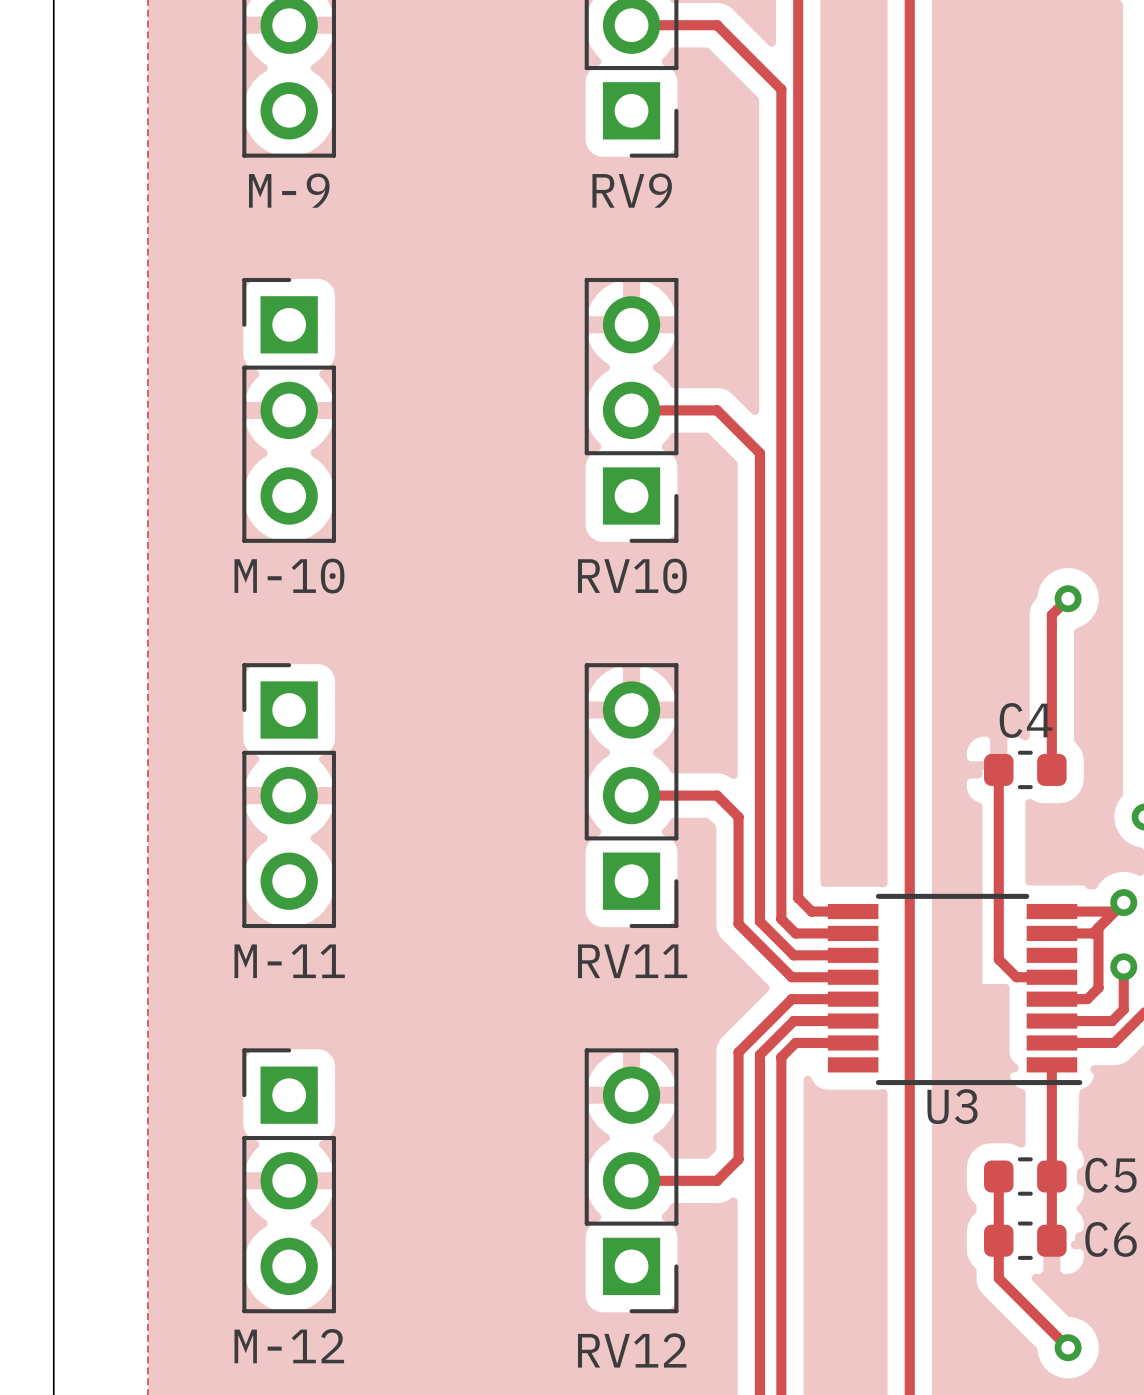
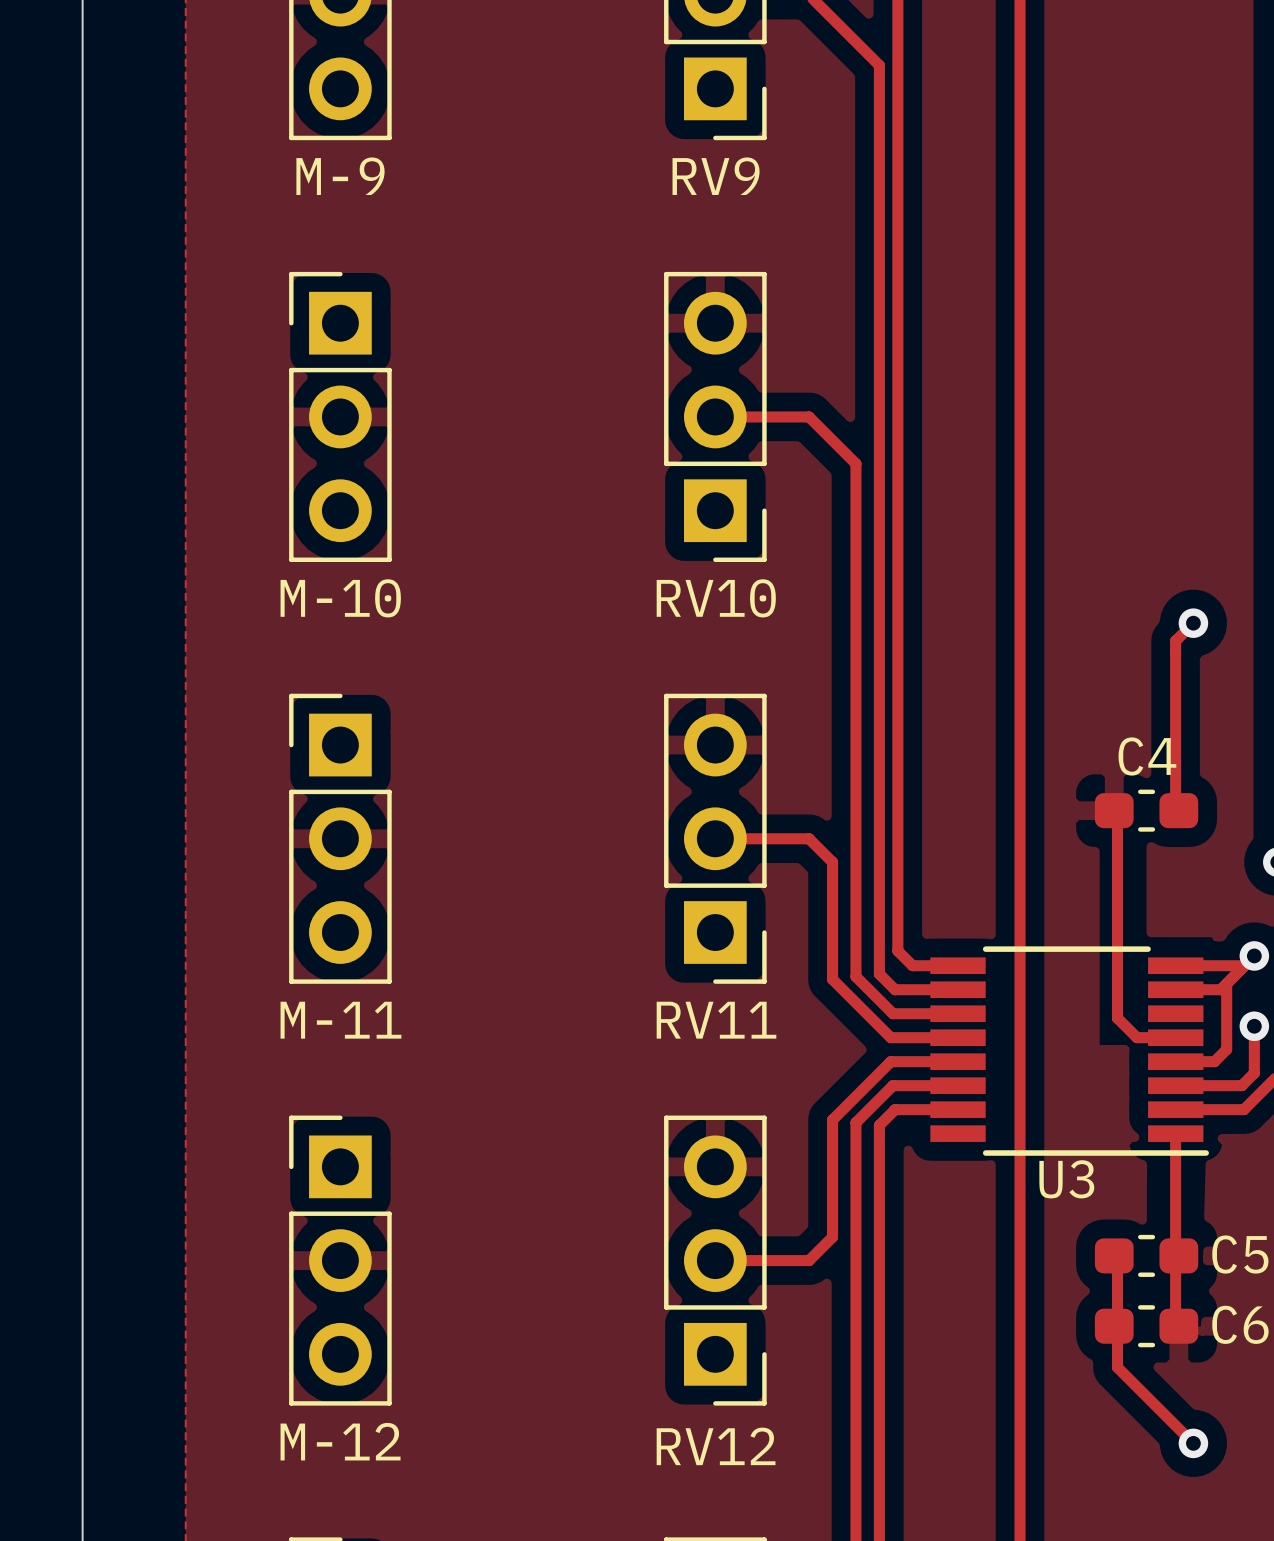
C4 footprint: [984, 750, 1067, 790] -> [1094, 789, 1199, 832]
C5 footprint: [984, 1157, 1067, 1196] -> [1094, 1234, 1199, 1277]
C6 footprint: [984, 1221, 1067, 1260] -> [1094, 1305, 1199, 1348]

